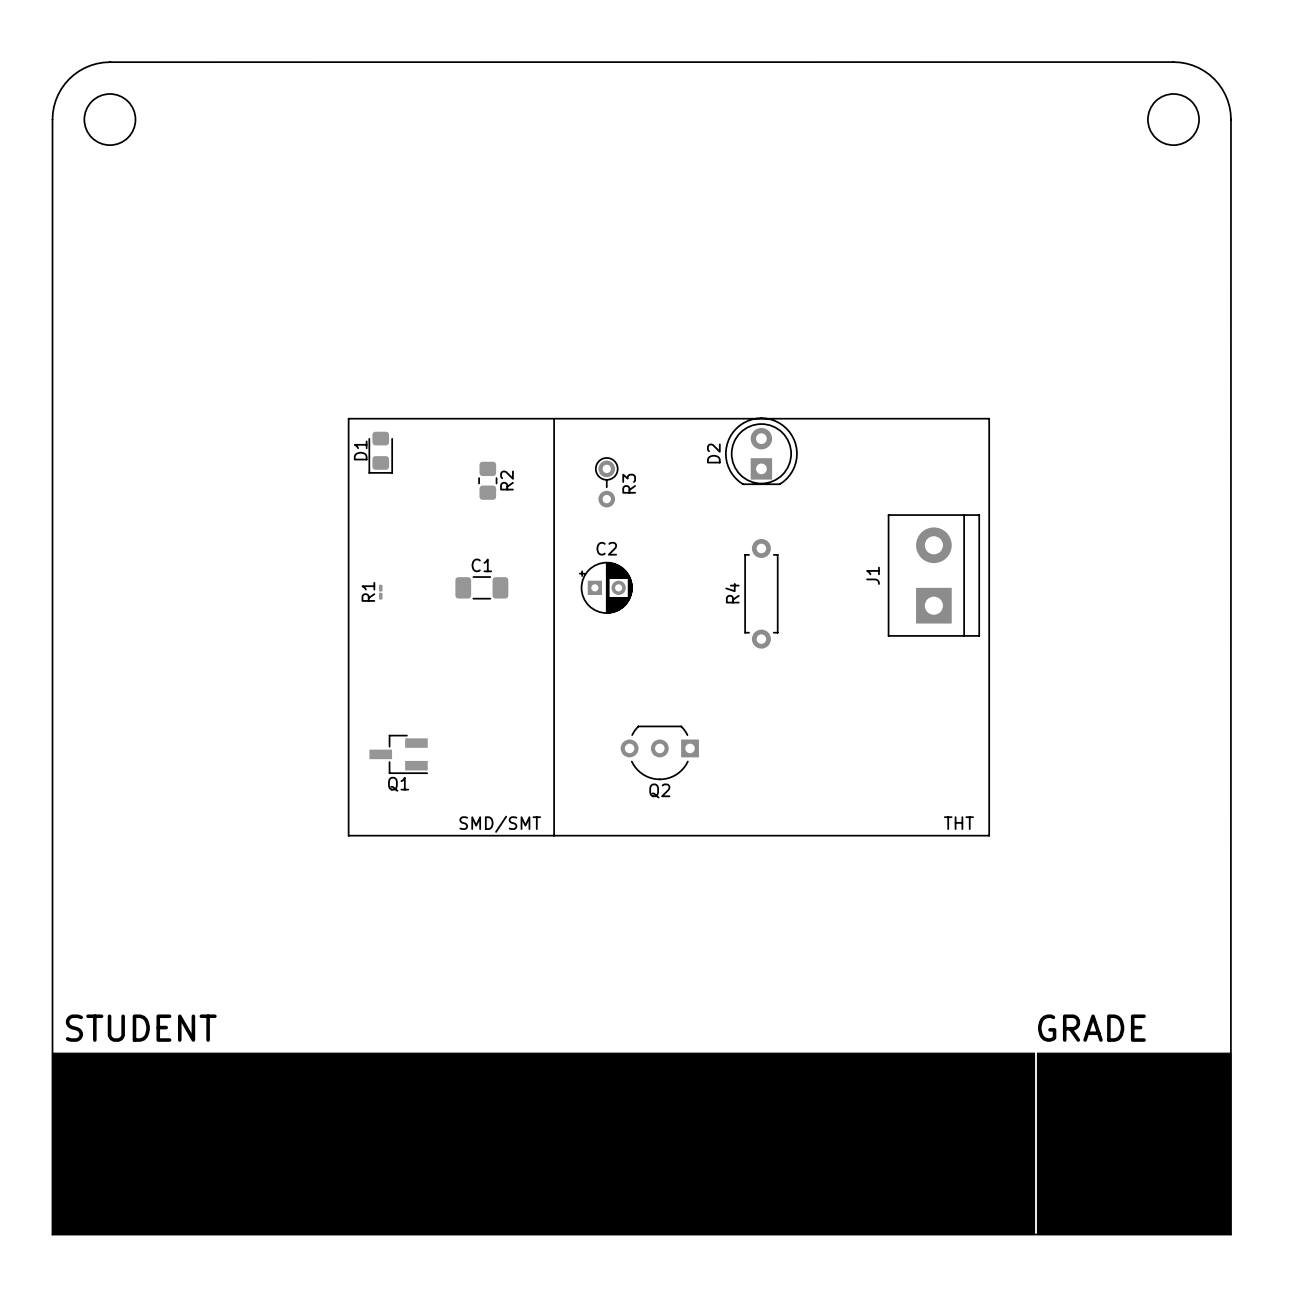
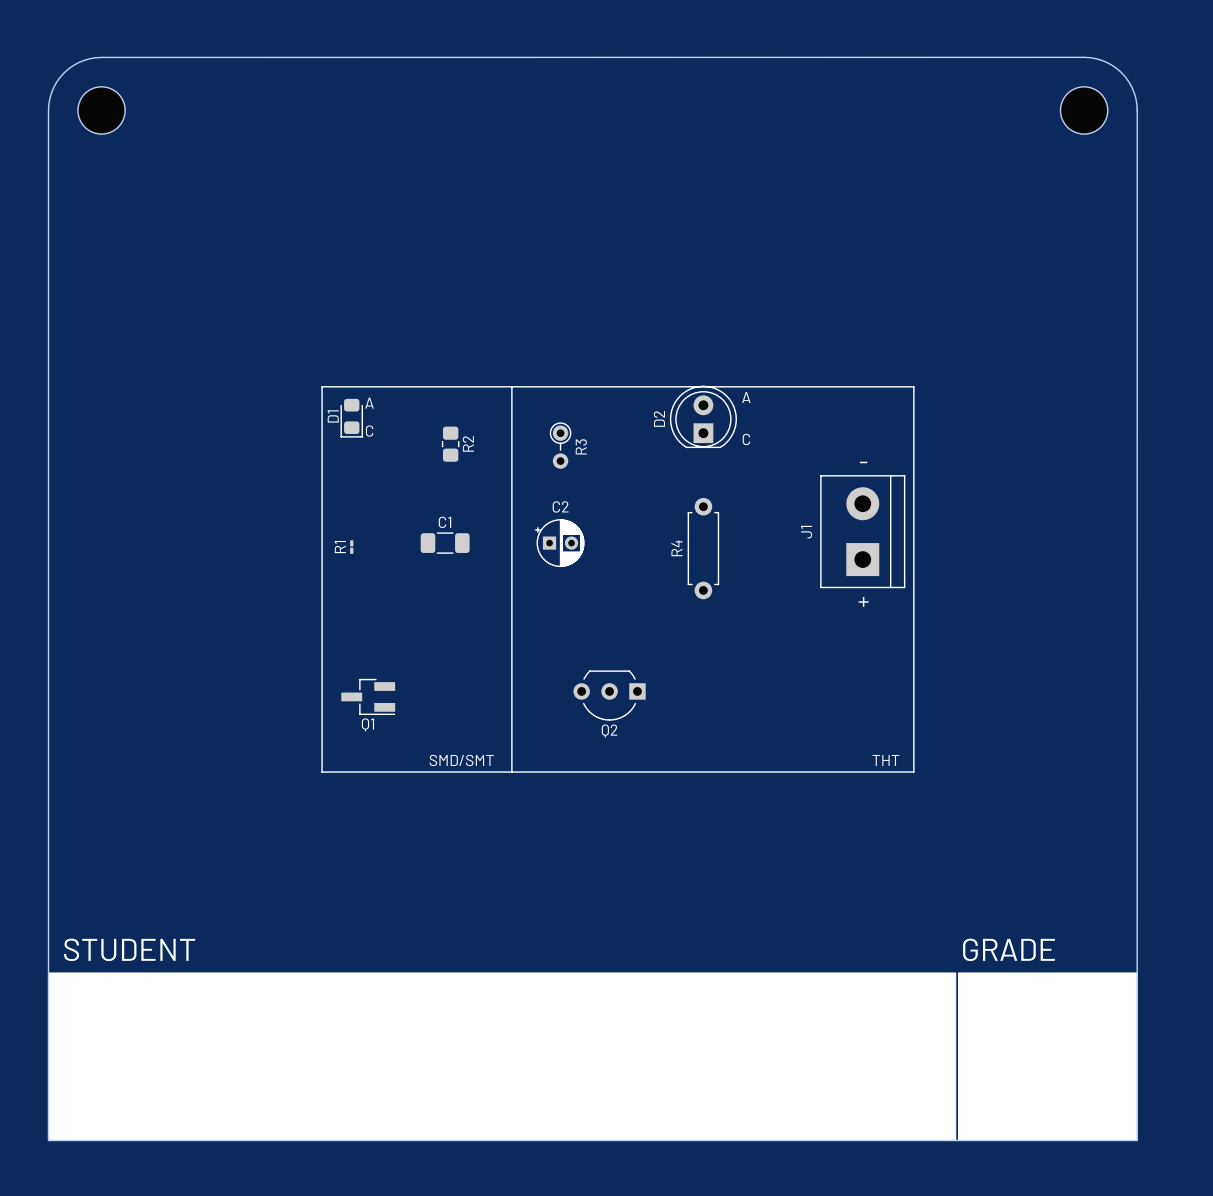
text: none -> A (746, 397)
text: none -> A (369, 403)
text: none -> C (369, 431)
text: none -> C (746, 439)
text: none -> - (863, 462)
text: none -> + (863, 601)

